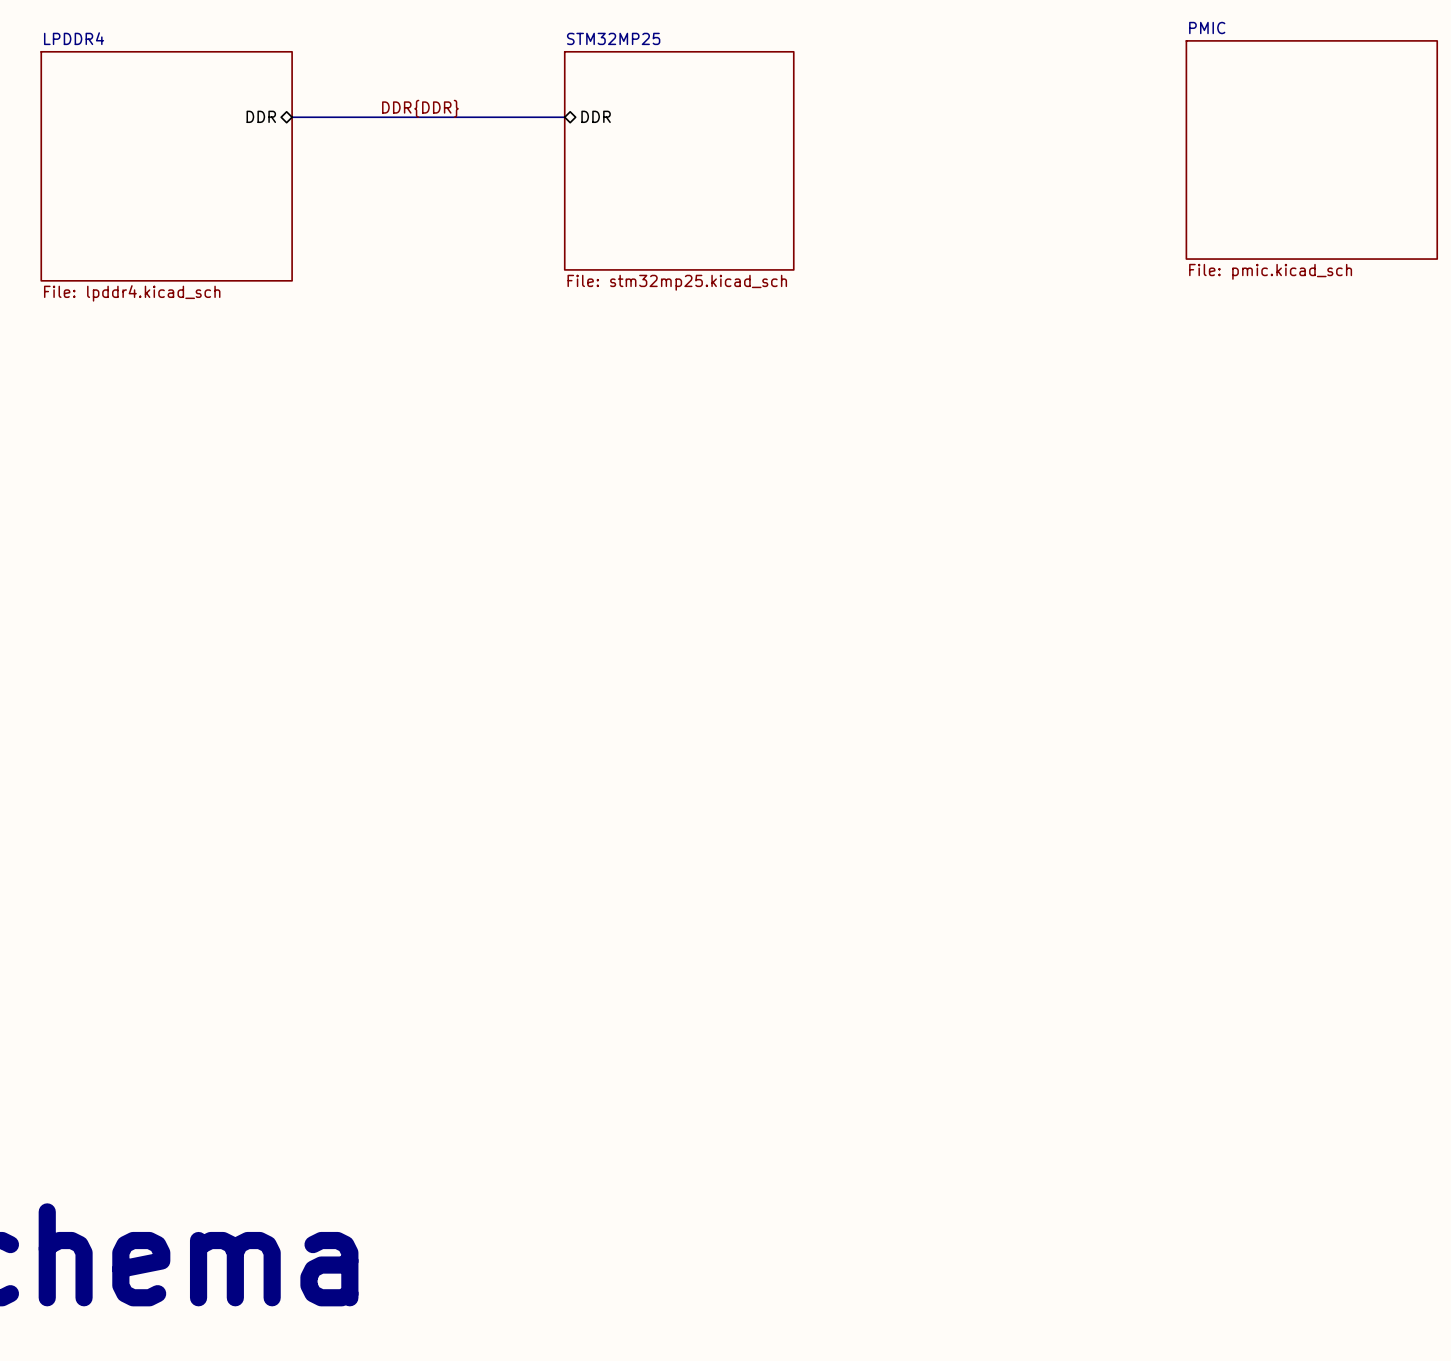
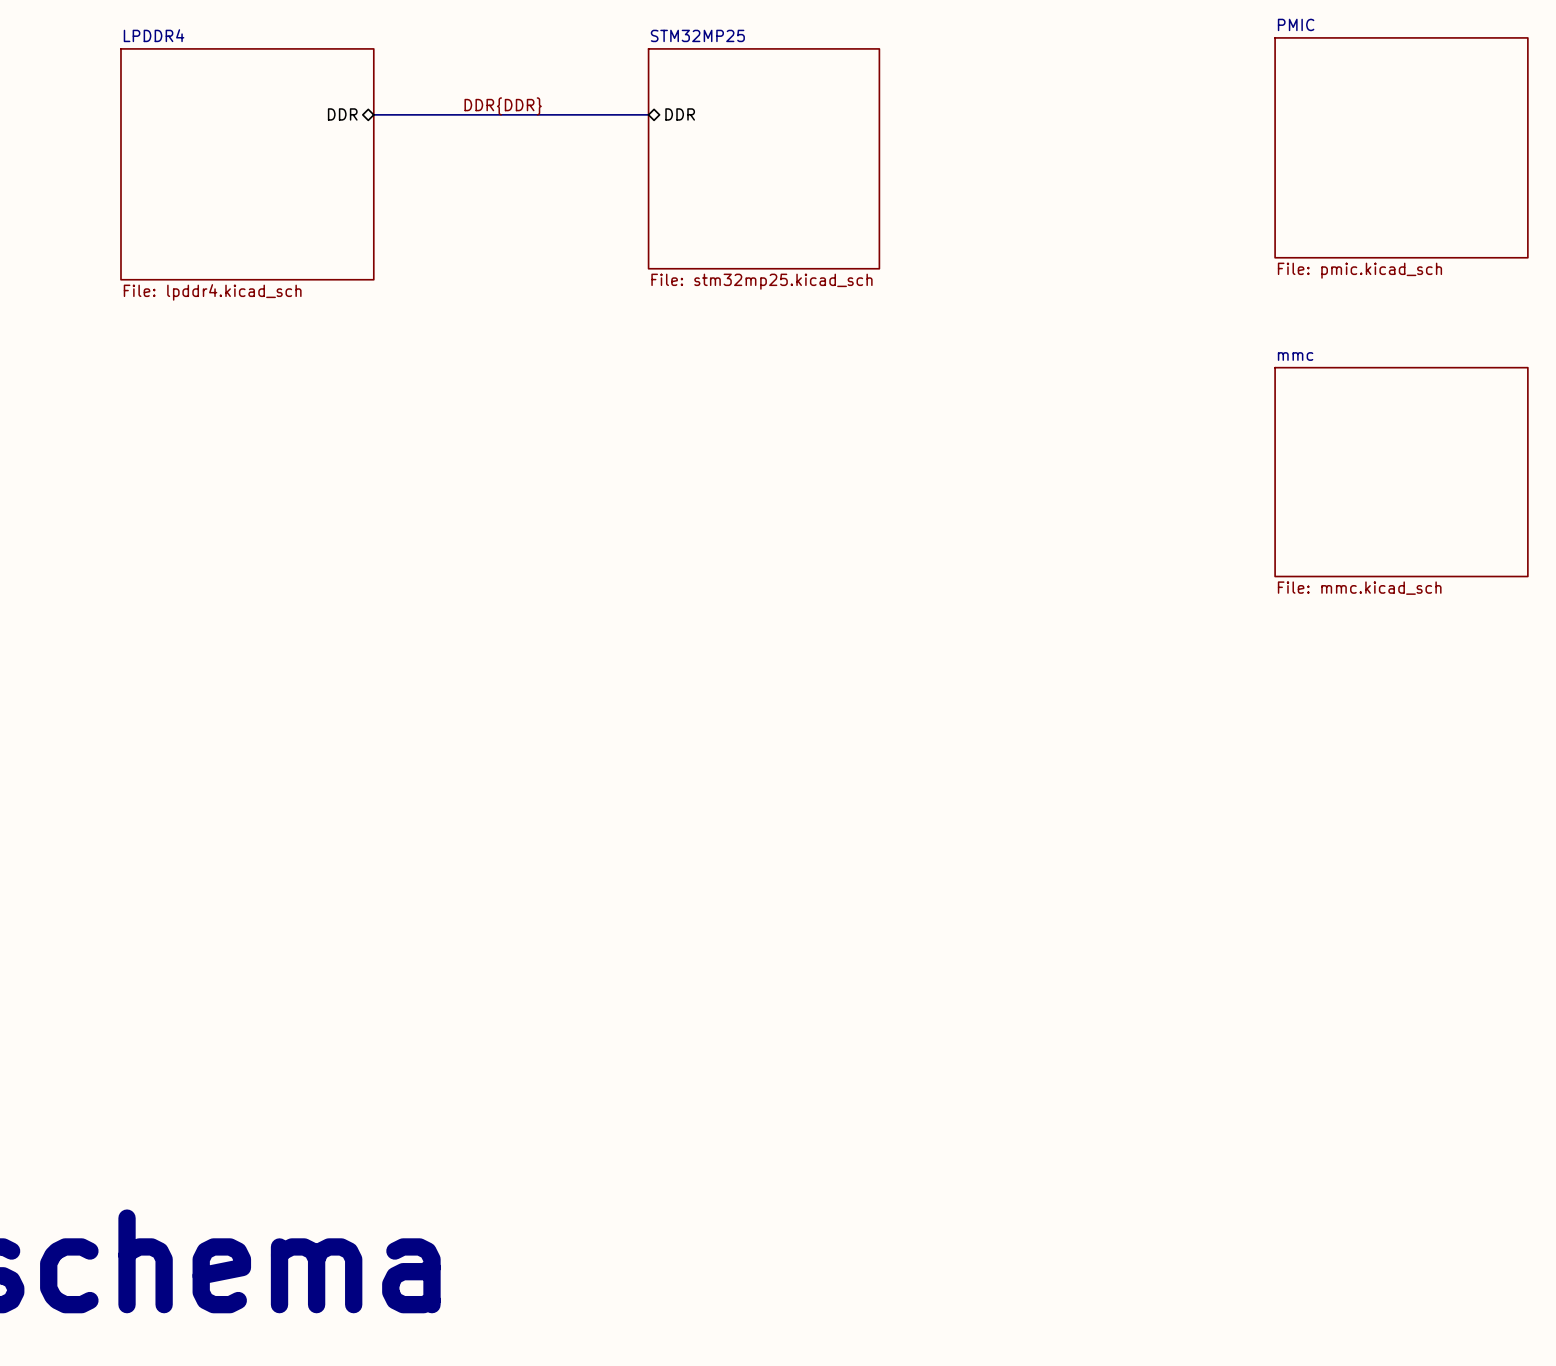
sheet mmc: none -> File: mmc.kicad_sch (1401, 472)

